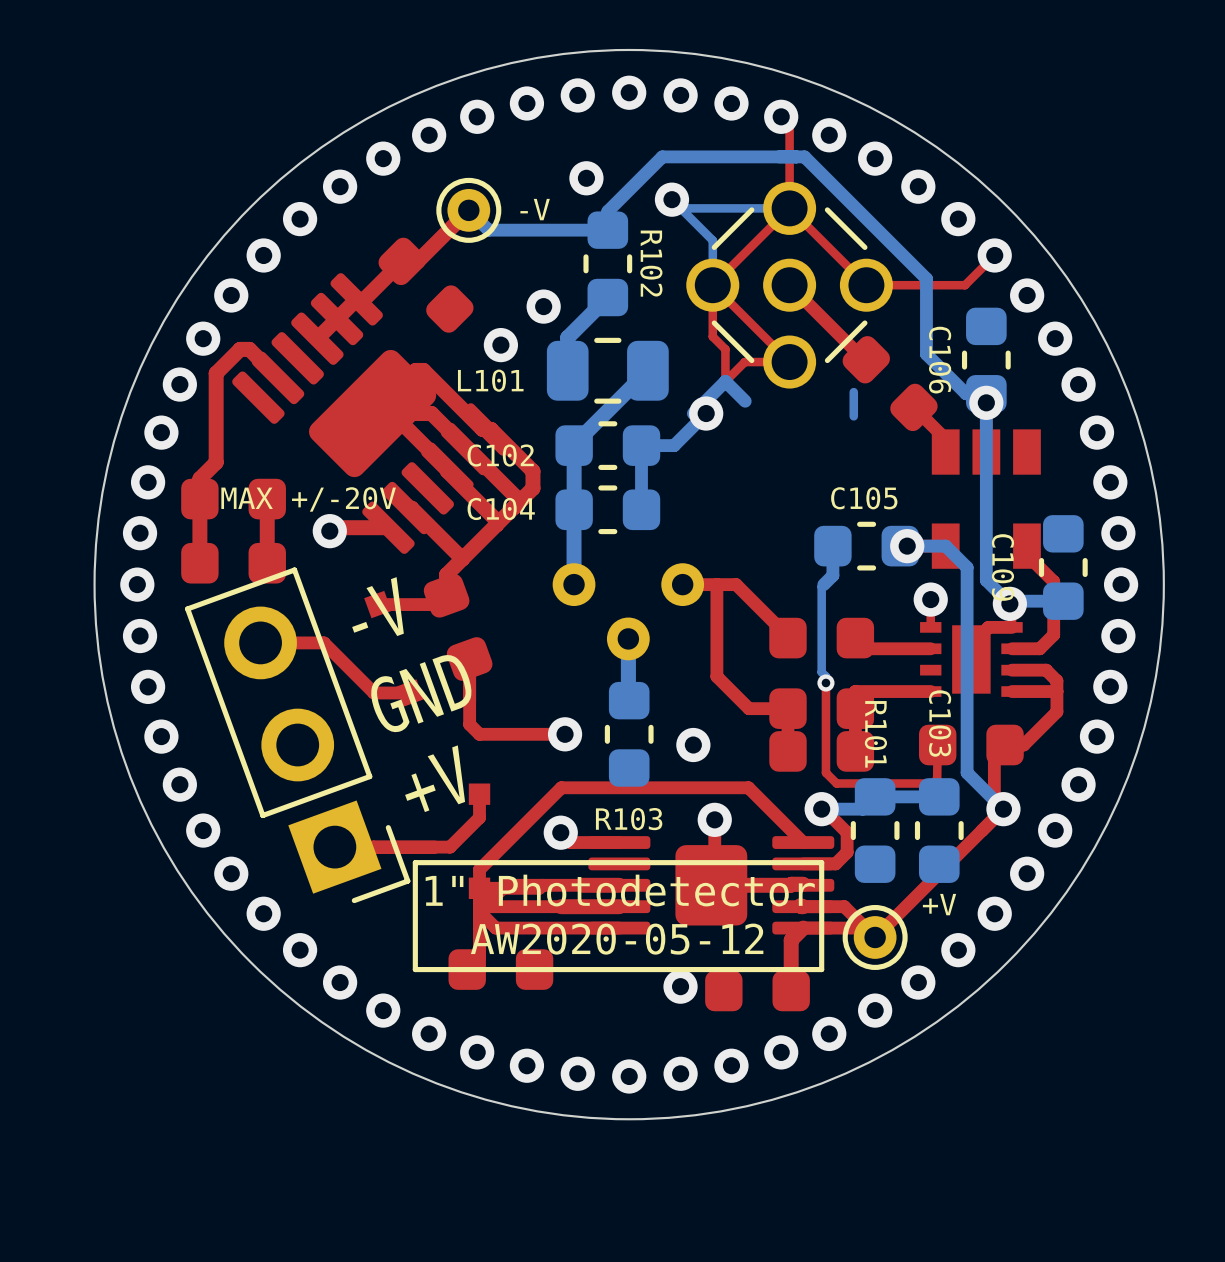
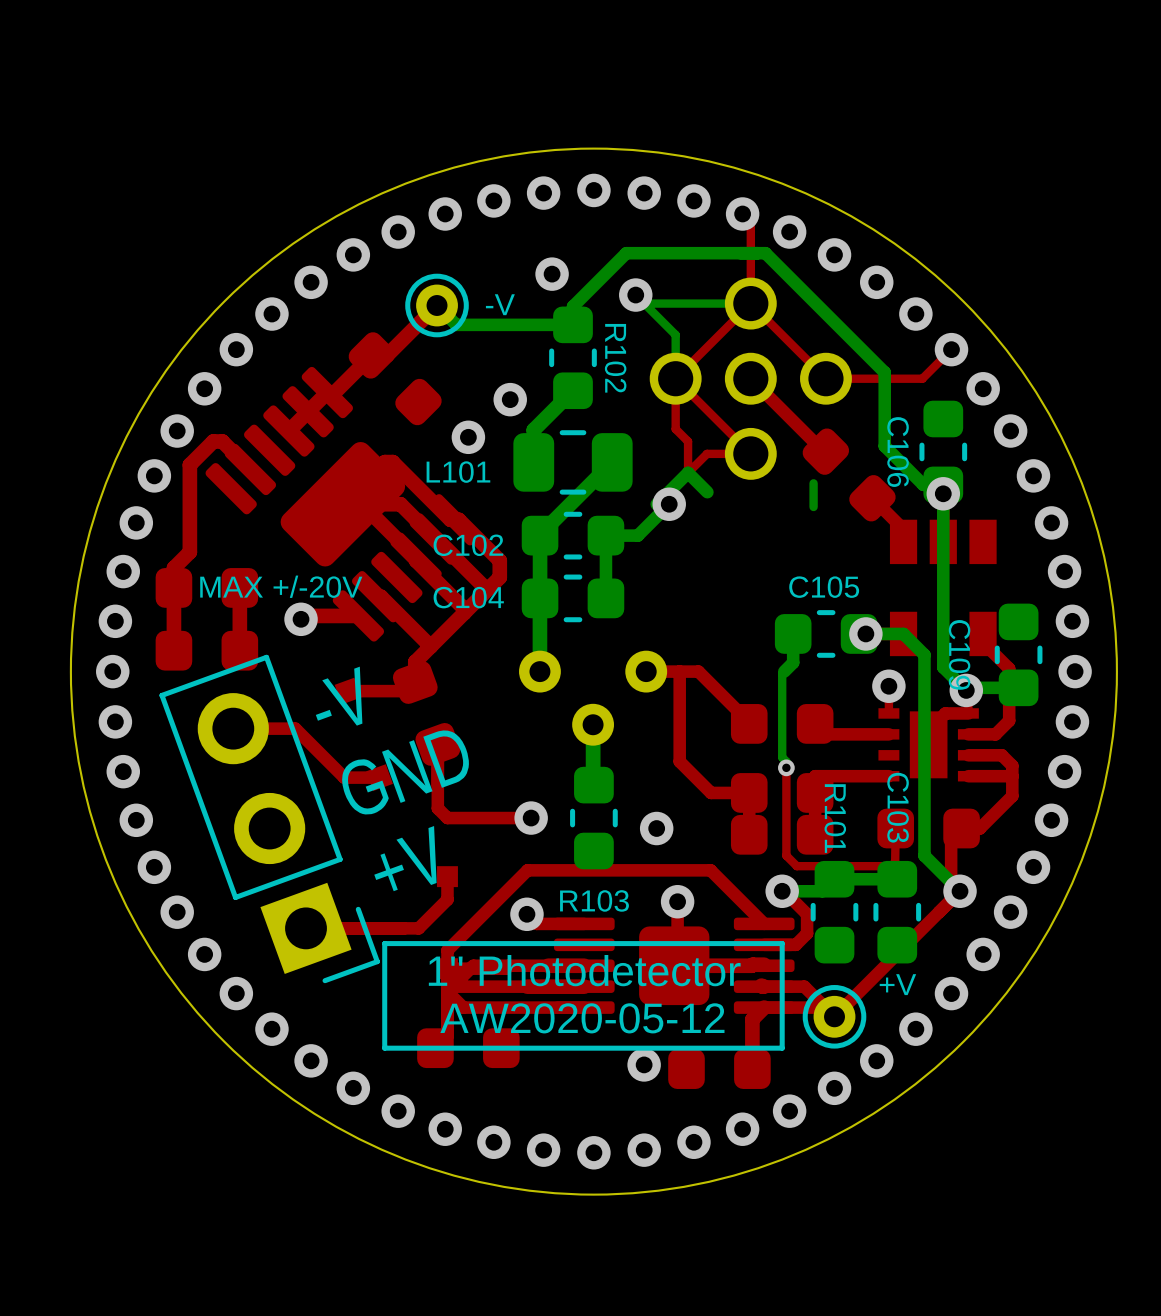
part side: bottom (789, 285) -> top (750, 378)

